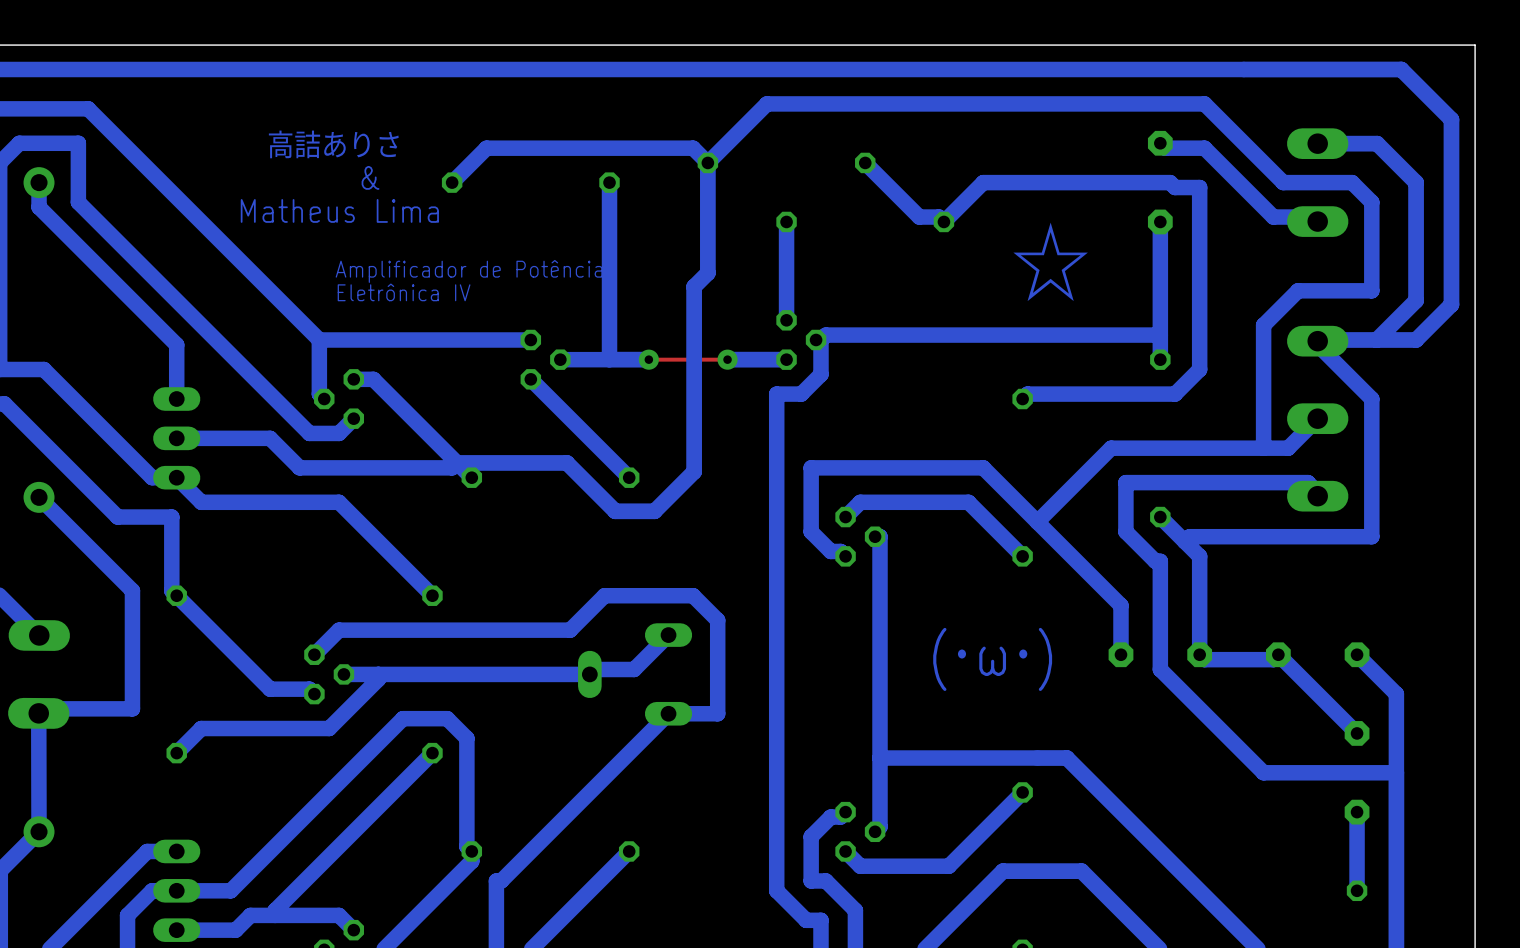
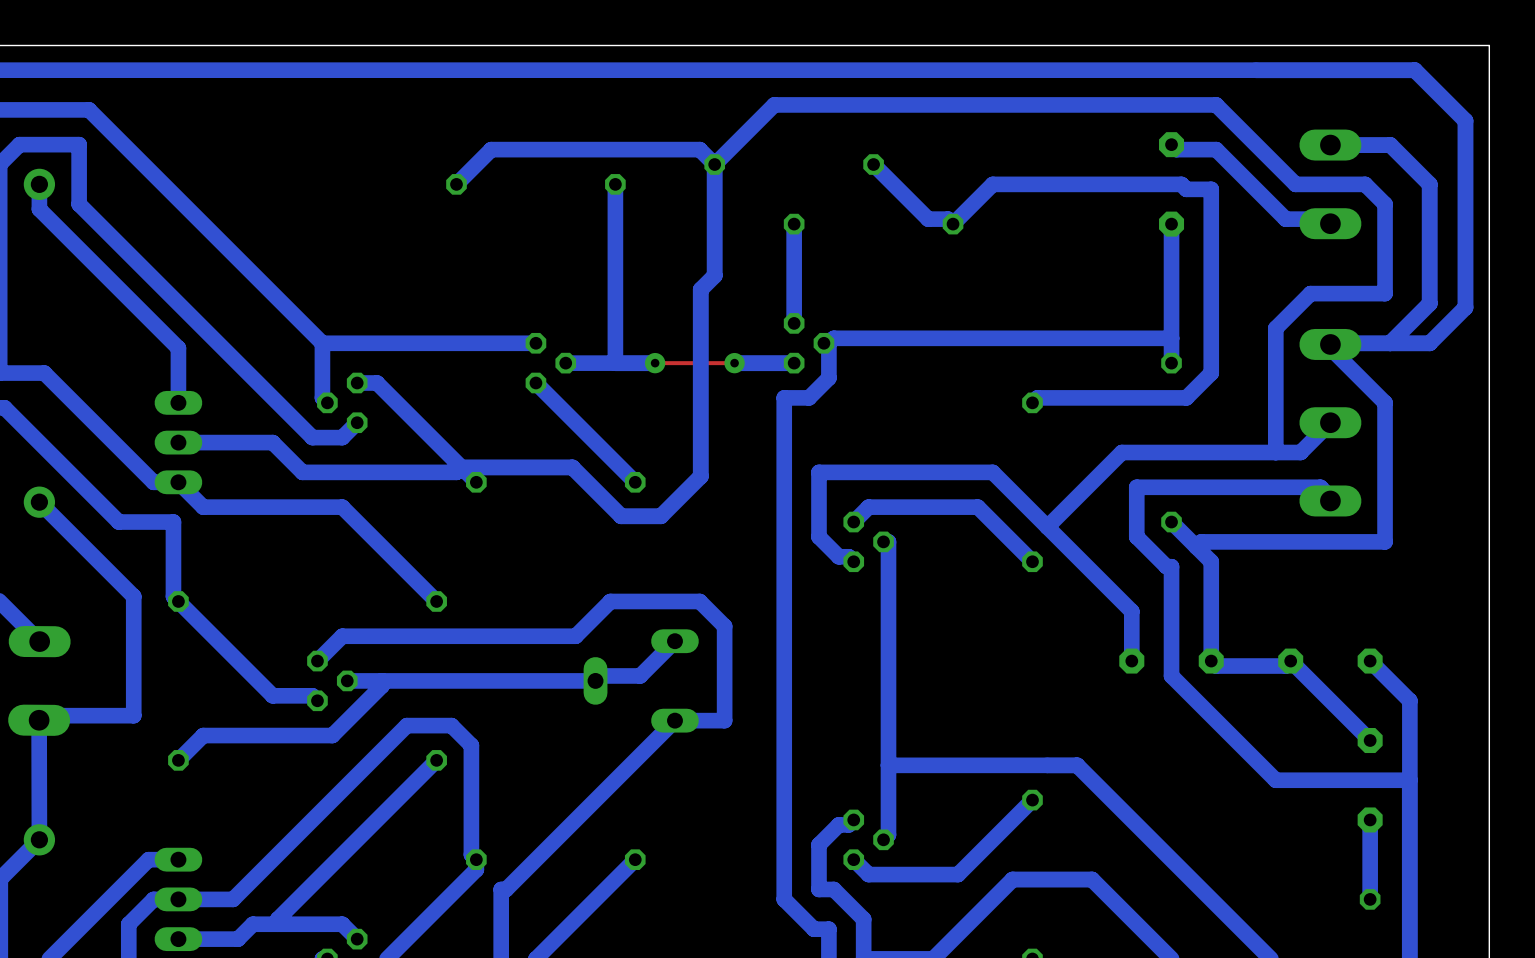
text: 高詰ありさ (333, 144) -> none
text: & (370, 177) -> none
text: Matheus Lima (339, 210) -> none
text: ☆ (1050, 261) -> none
text: Amplificador de Potência (469, 271) -> none
text: Eletrônica IV (404, 292) -> none
text: (･ω･) (992, 659) -> none

